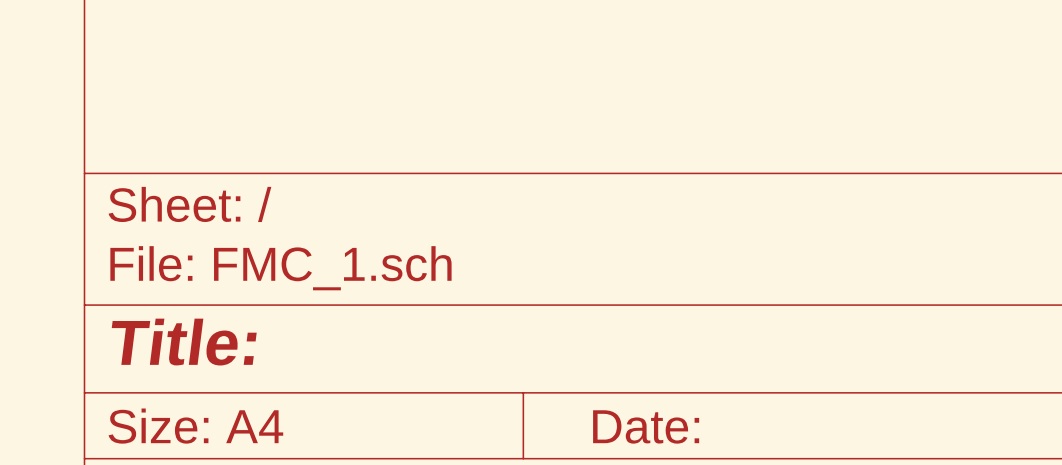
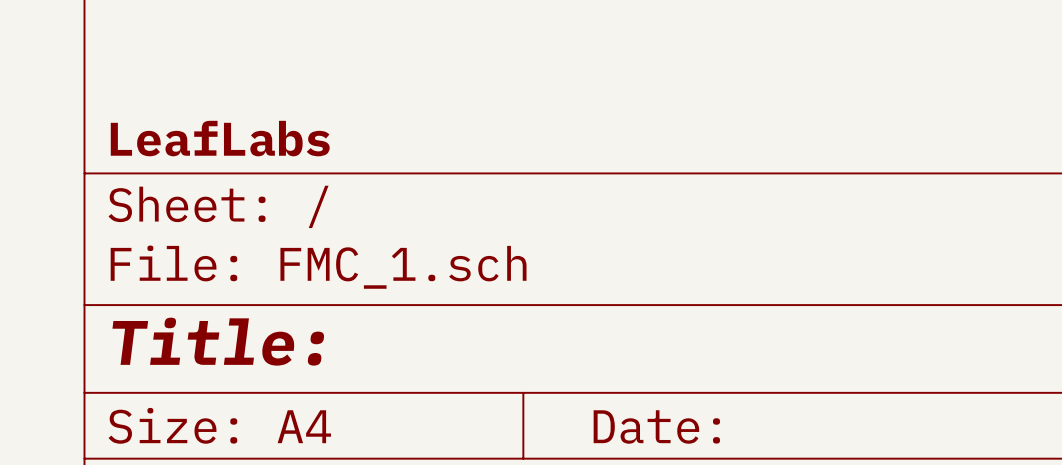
title block: none -> LeafLabs (220, 138)

